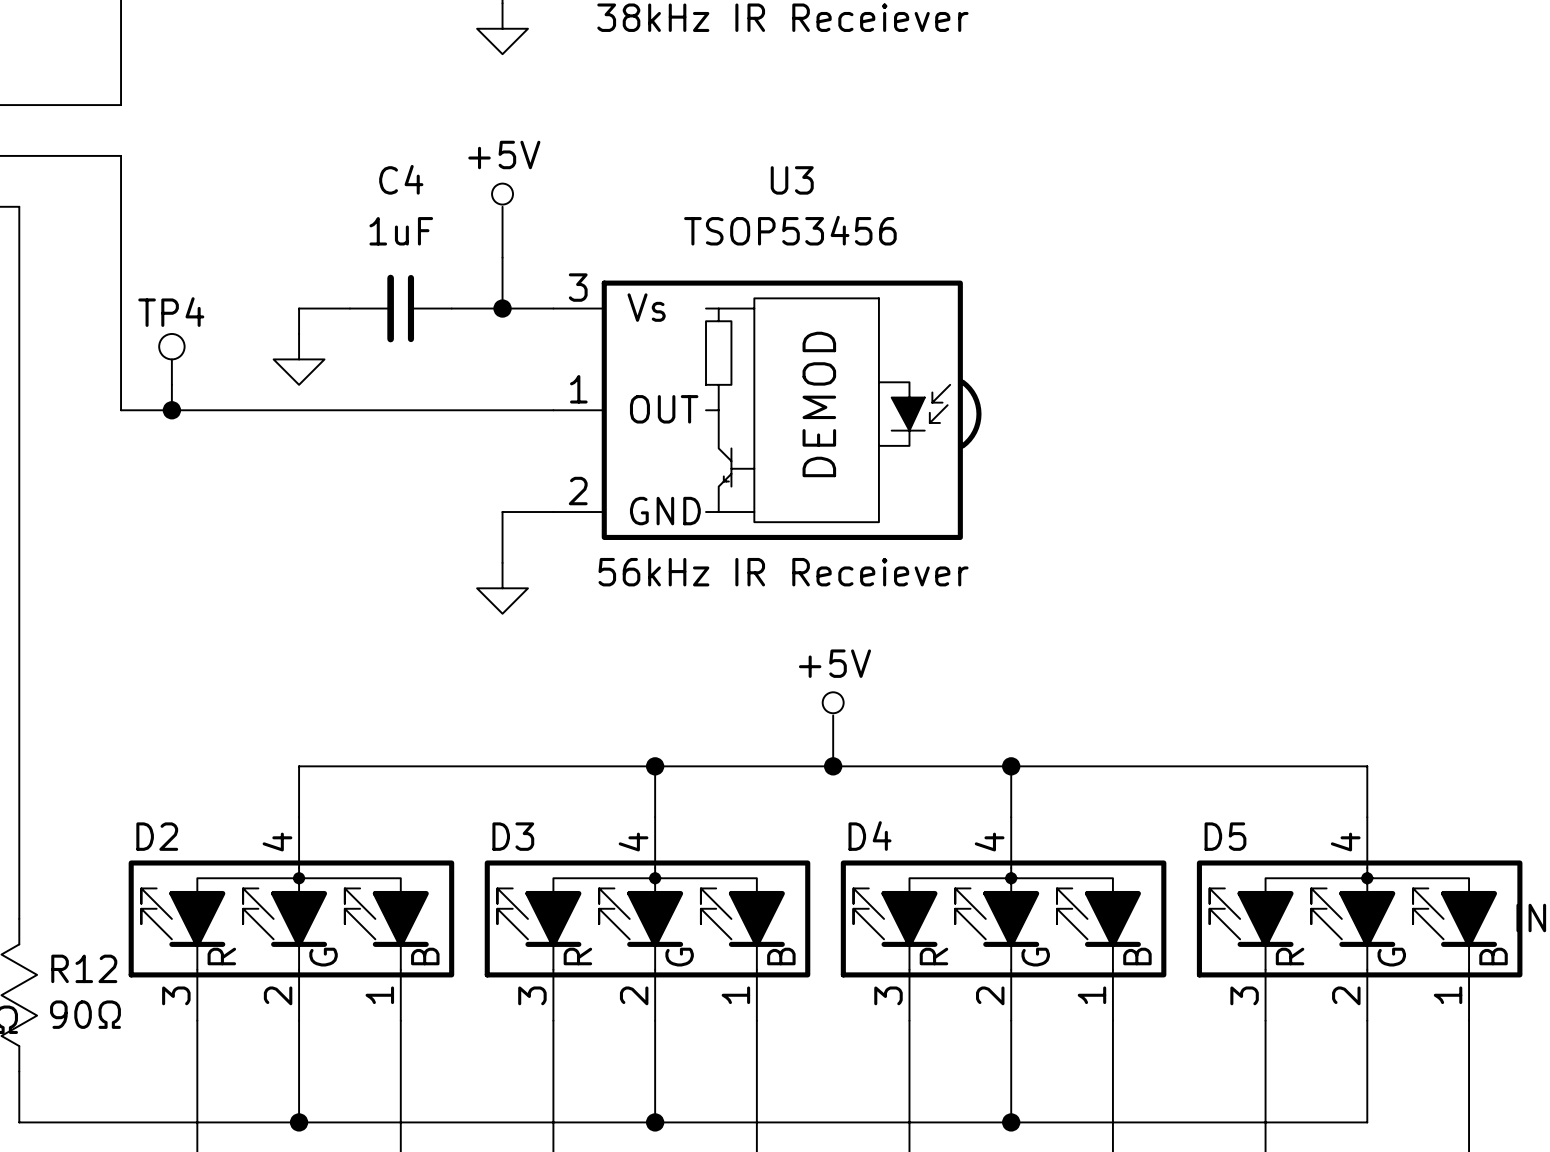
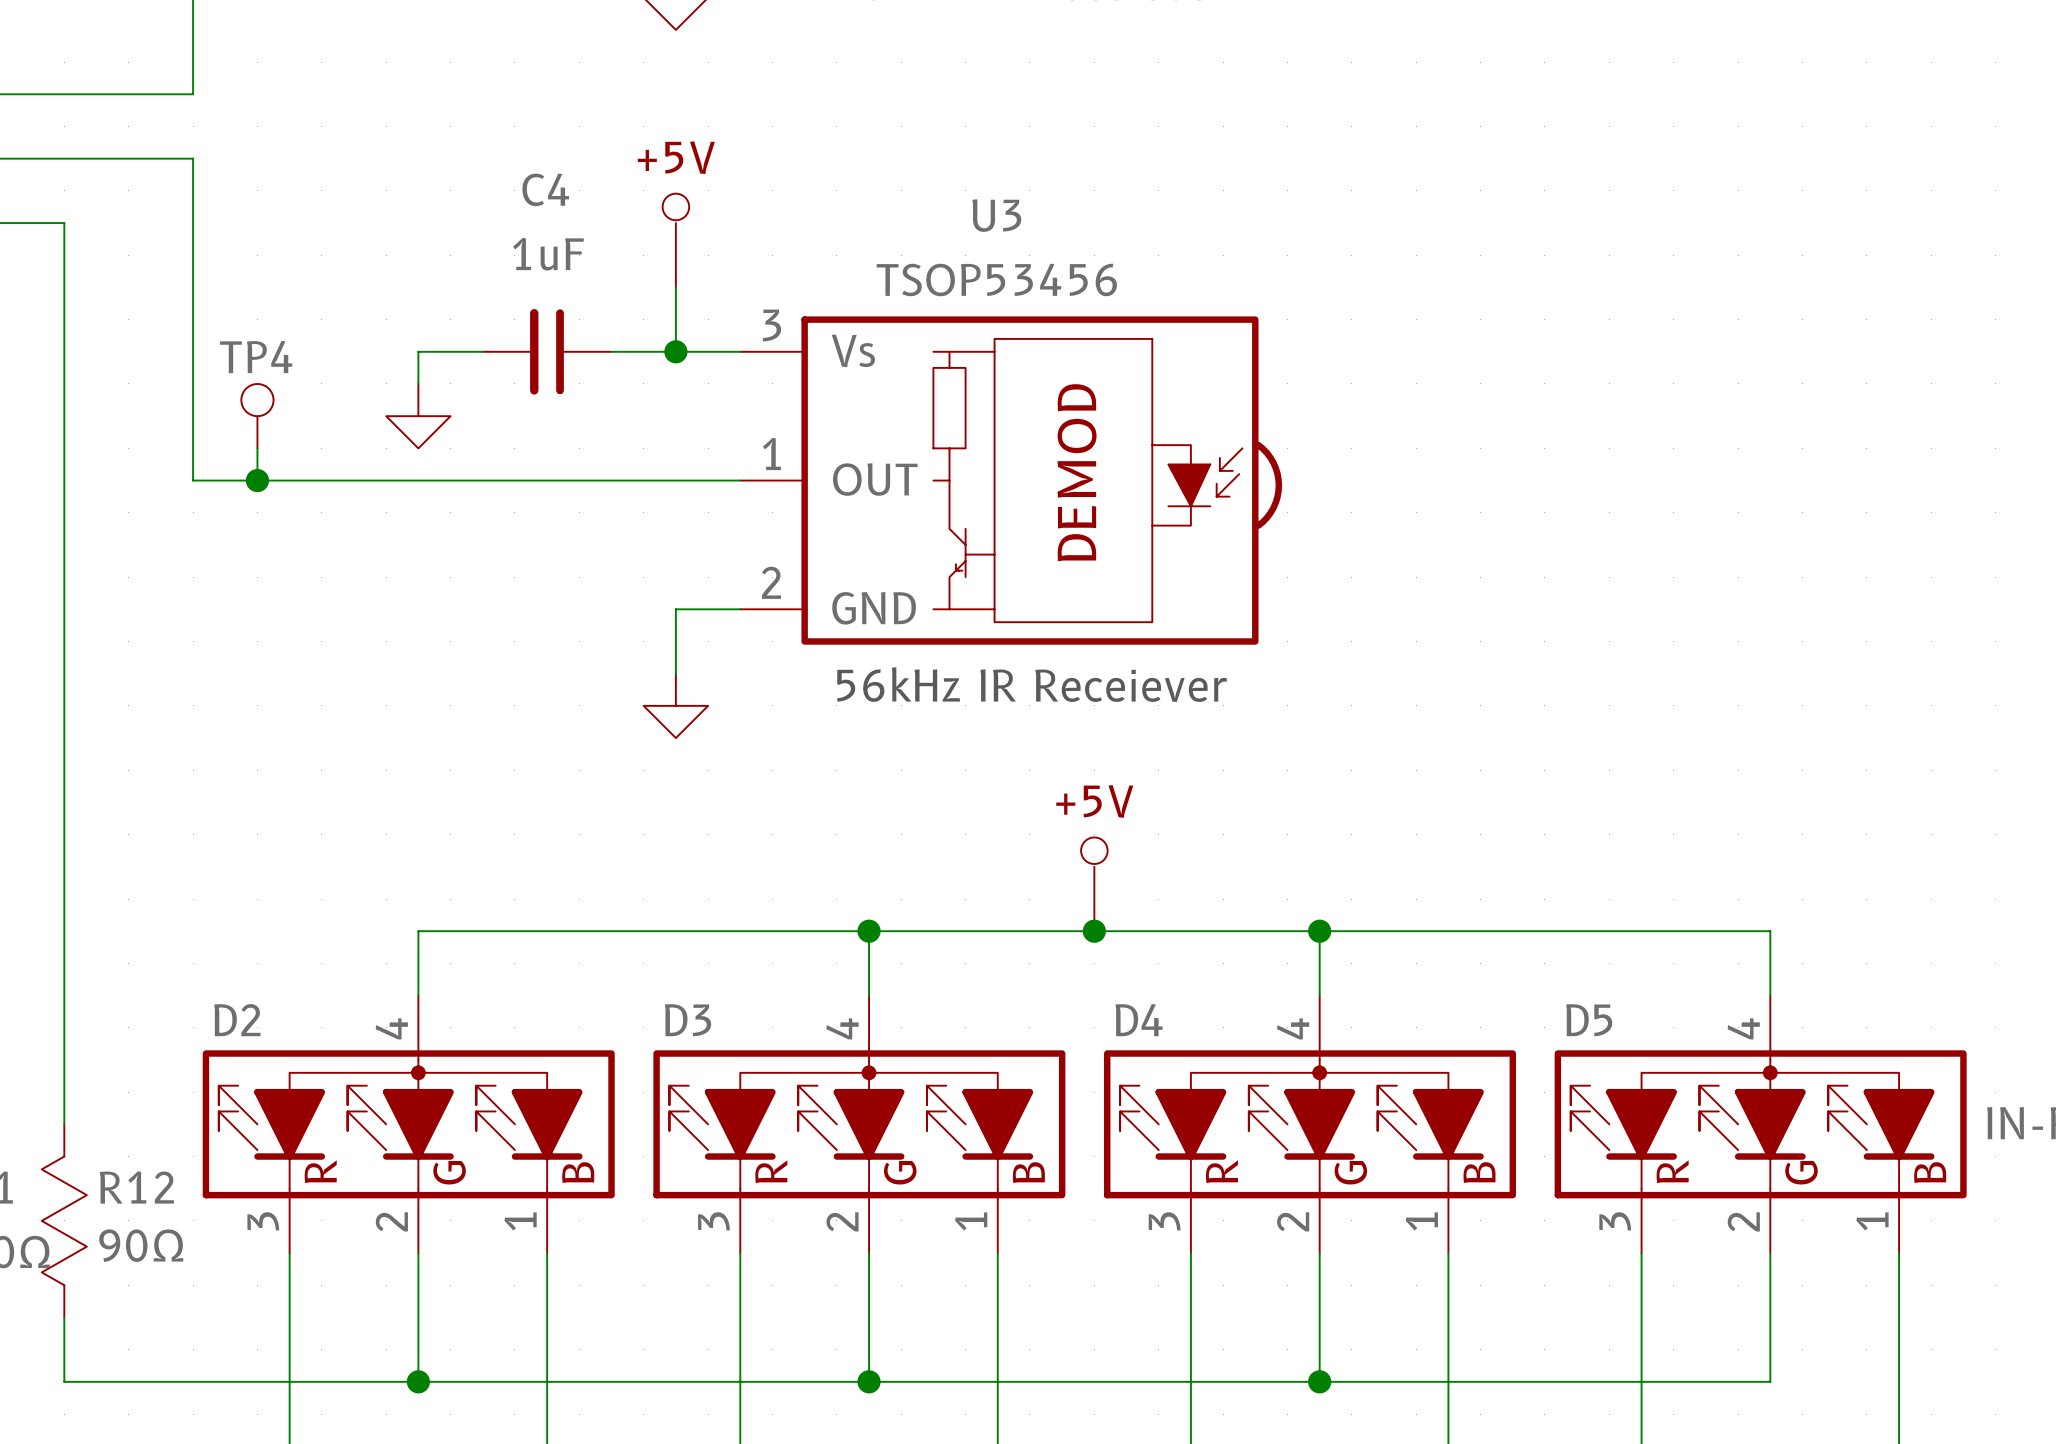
U3 name position: U3 (792, 180) -> U3 (996, 215)
U3 value position: TSOP53456 (790, 230) -> TSOP53456 (996, 279)

